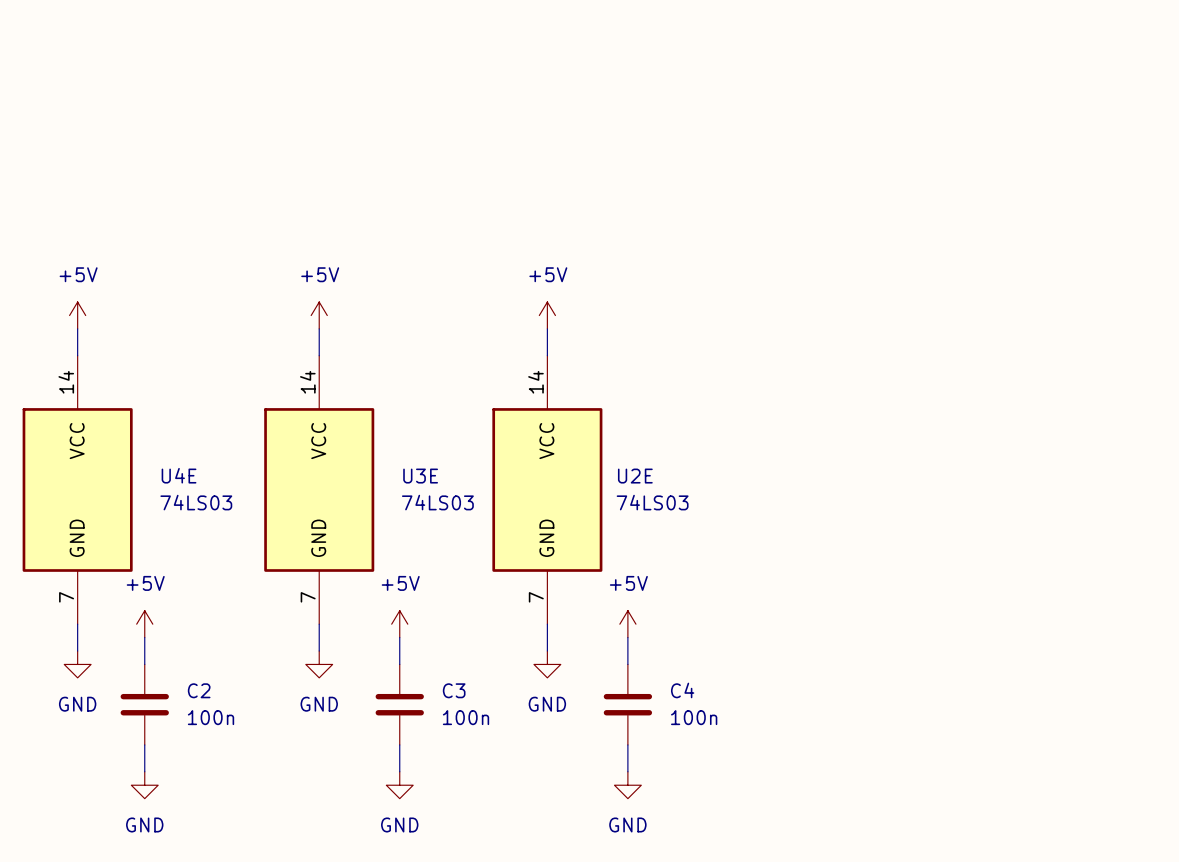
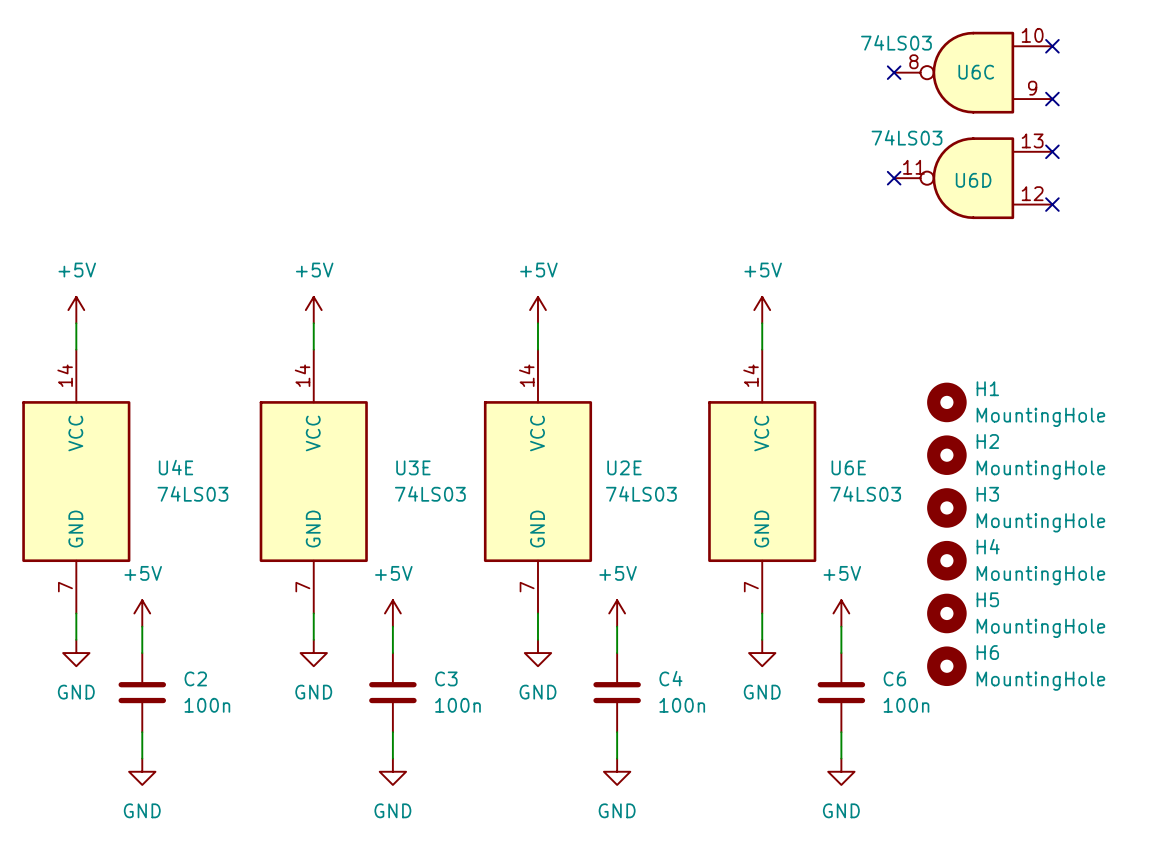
no-connect mark: none -> (1052, 46)
no-connect mark: none -> (894, 72)
U6C: none -> 74LS03 (973, 72)
no-connect mark: none -> (1052, 99)
no-connect mark: none -> (1052, 151)
no-connect mark: none -> (894, 178)
U6D: none -> 74LS03 (973, 178)
no-connect mark: none -> (1052, 204)
power symbol: none -> +5V (762, 310)
wire: none -> (762, 323) (762, 349)
H1: none -> MountingHole (946, 402)
H2: none -> MountingHole (946, 455)
U6E: none -> 74LS03 (762, 481)
H3: none -> MountingHole (946, 507)
H4: none -> MountingHole (946, 560)
wire: none -> (762, 613) (762, 639)
power symbol: none -> +5V (841, 613)
H5: none -> MountingHole (946, 613)
wire: none -> (841, 626) (841, 653)
power symbol: none -> GND (762, 653)
H6: none -> MountingHole (946, 666)
C6: none -> 100n (841, 692)
wire: none -> (841, 732) (841, 758)
power symbol: none -> GND (841, 771)

